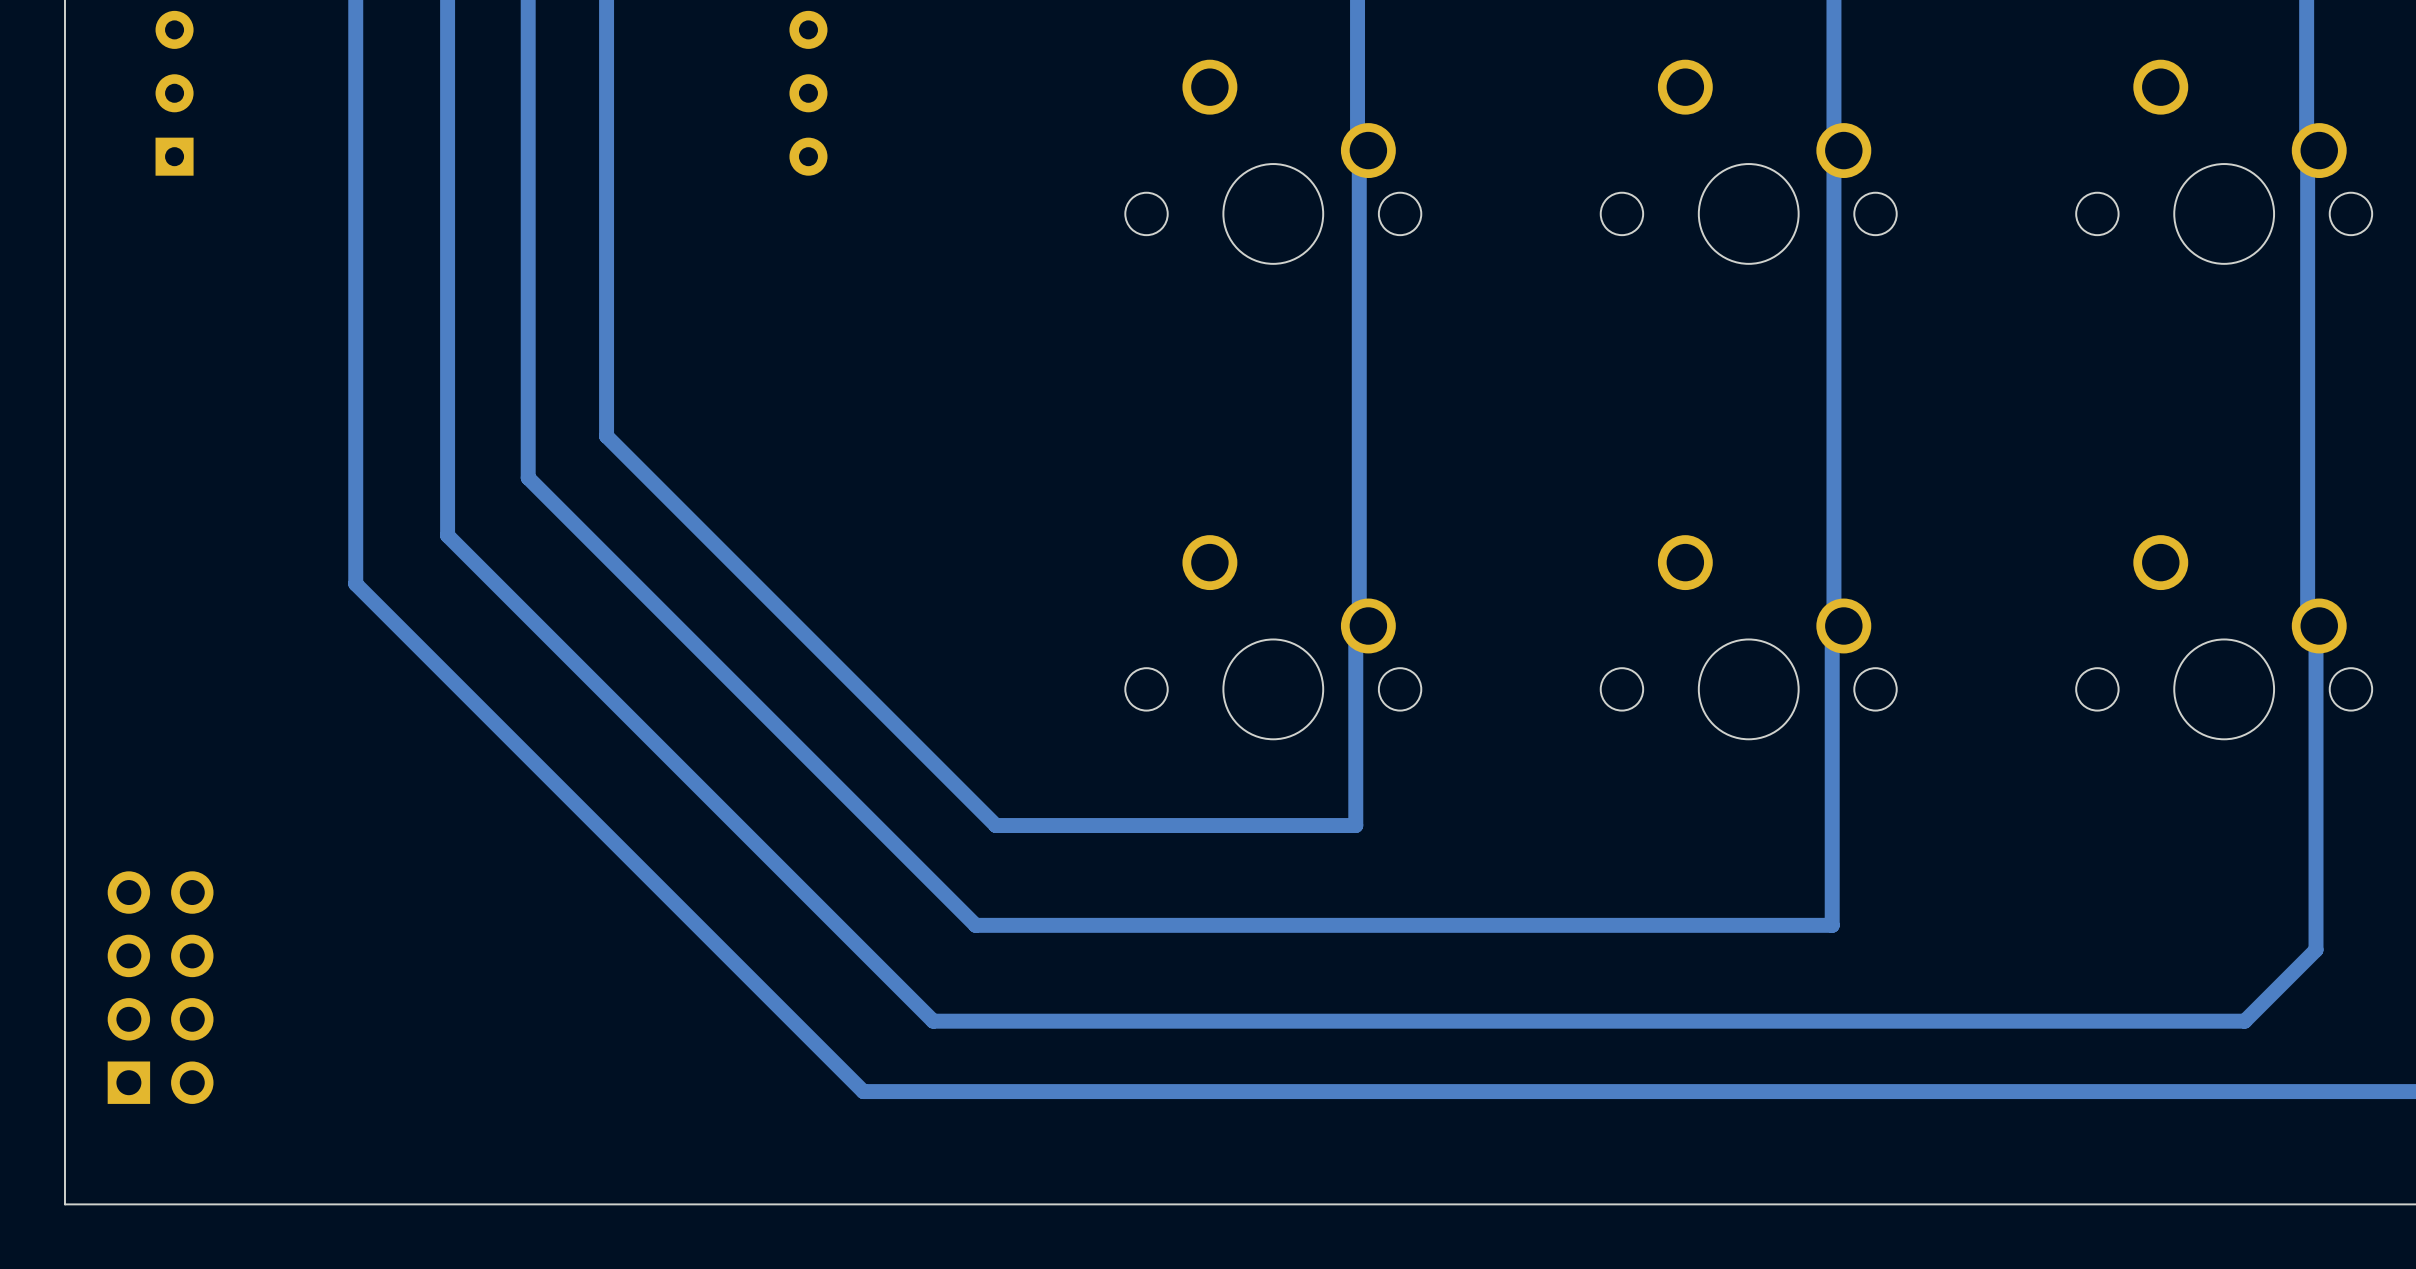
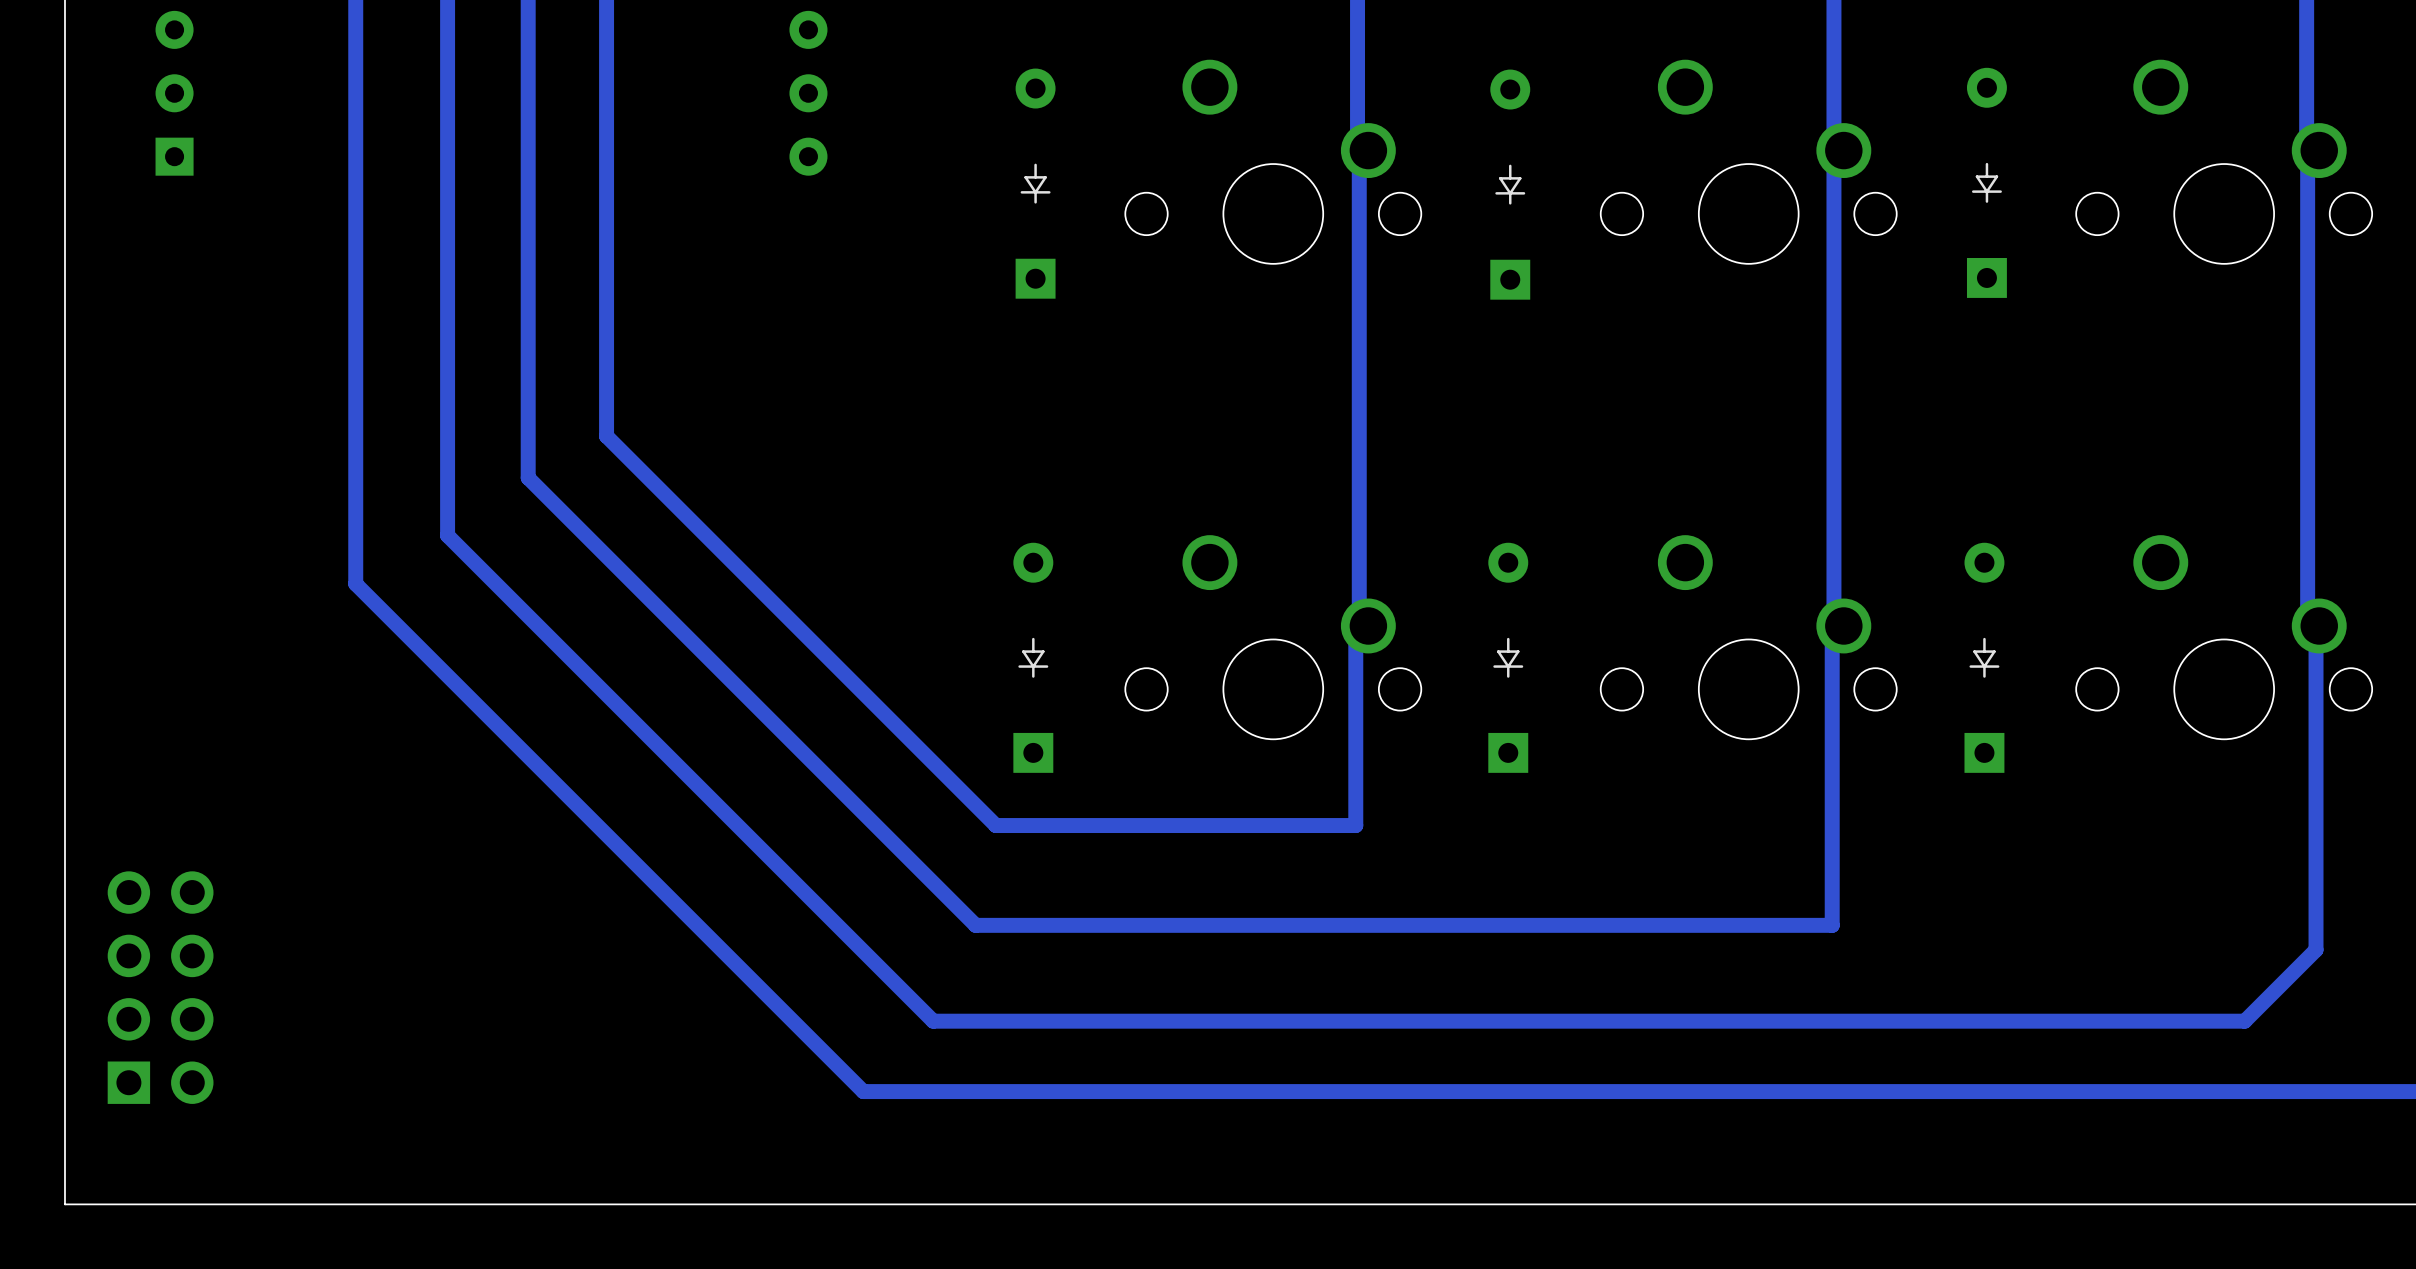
part: none -> (1986, 182)
part: none -> (1035, 183)
part: none -> (1510, 184)
part: none -> (1033, 657)
part: none -> (1508, 657)
part: none -> (1984, 657)

